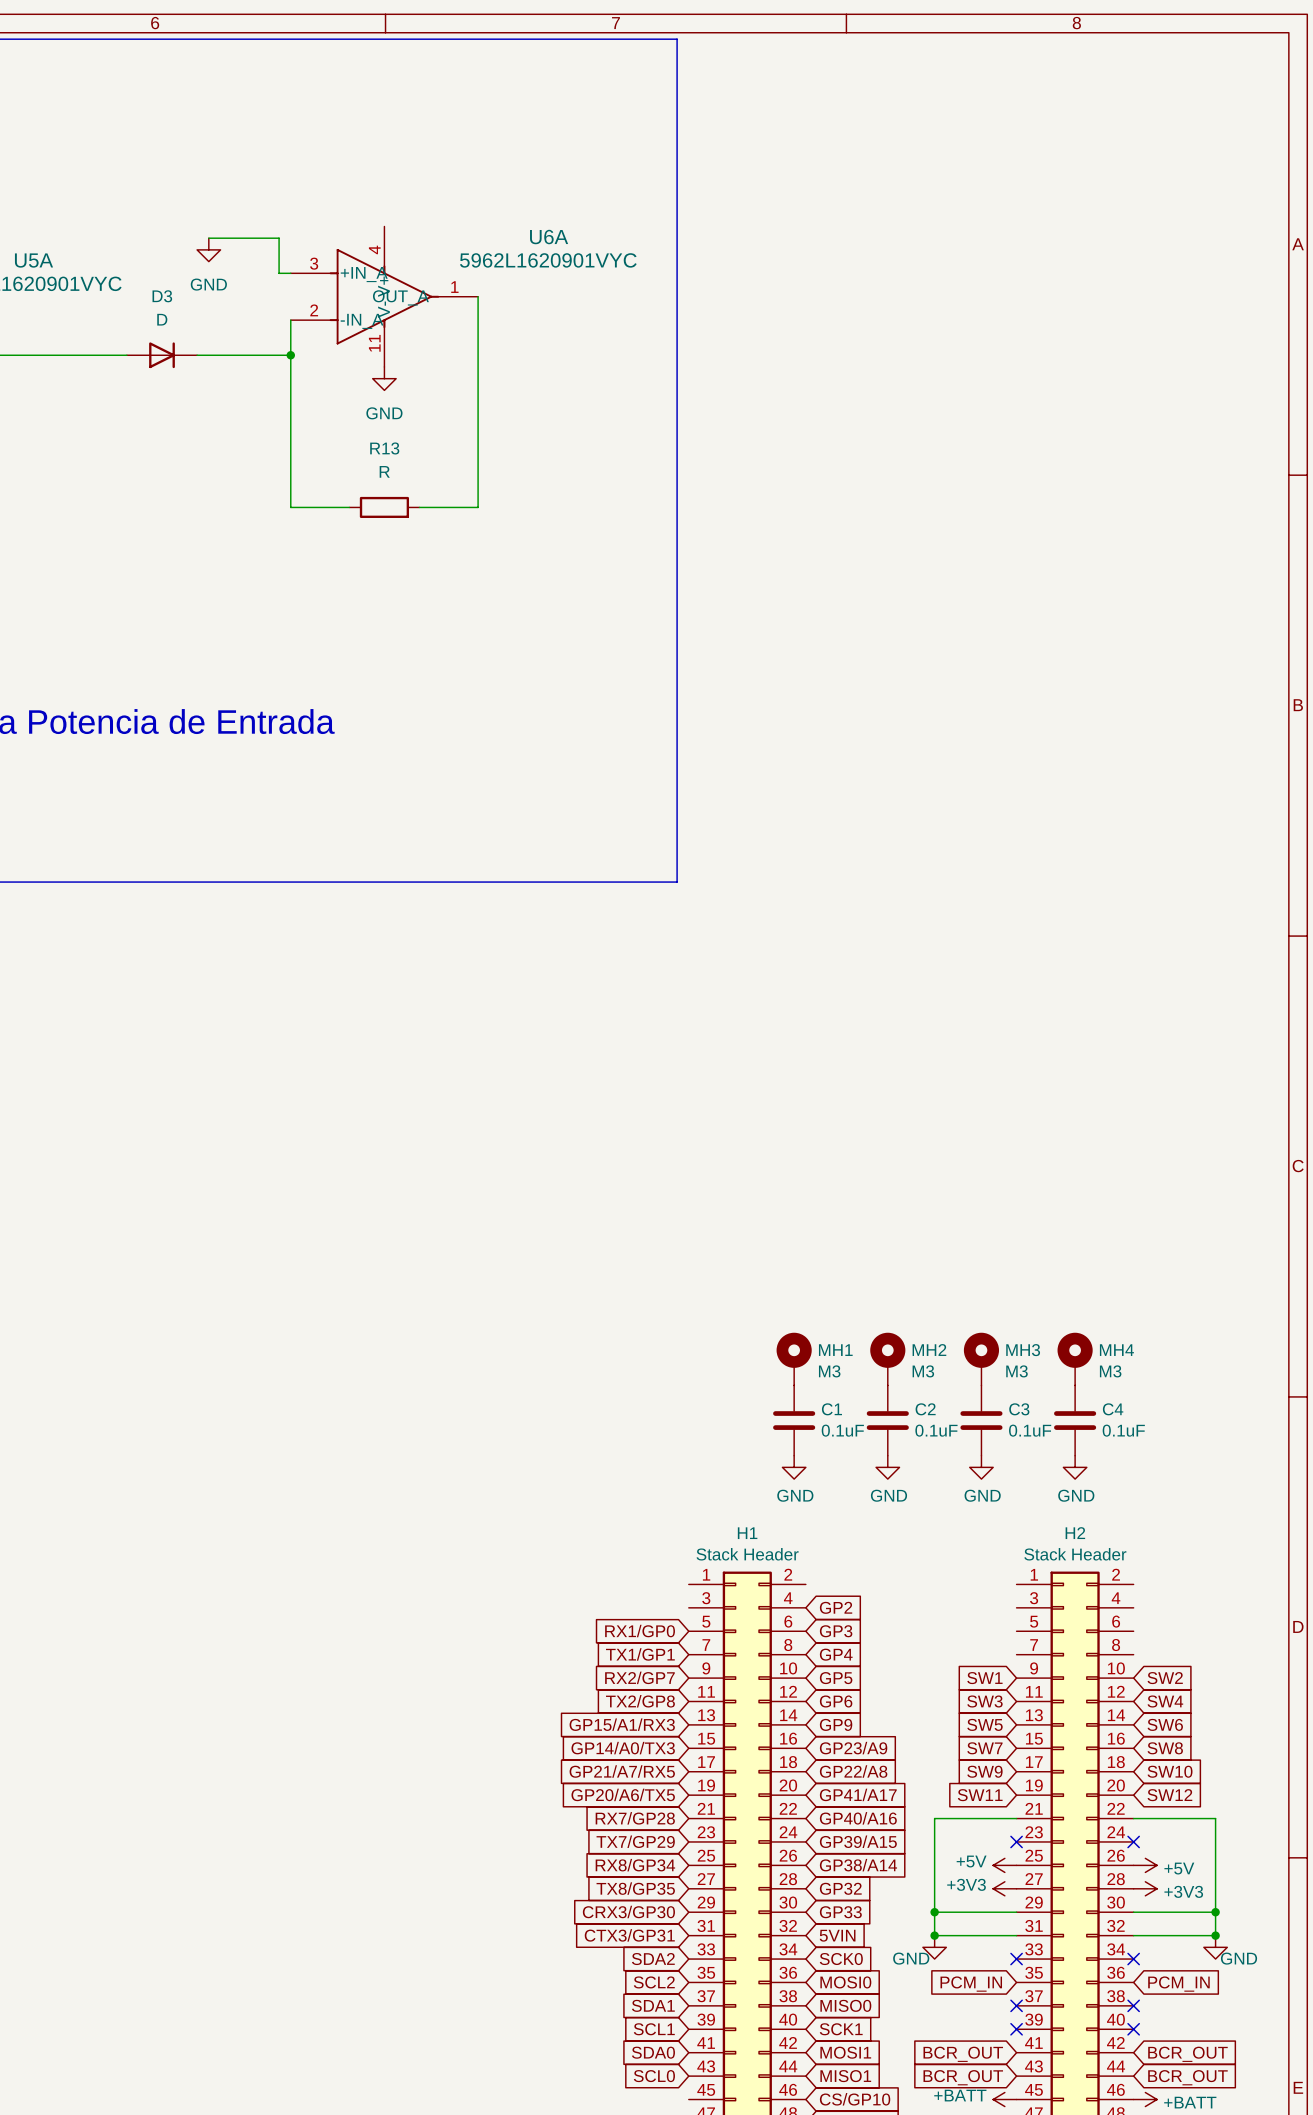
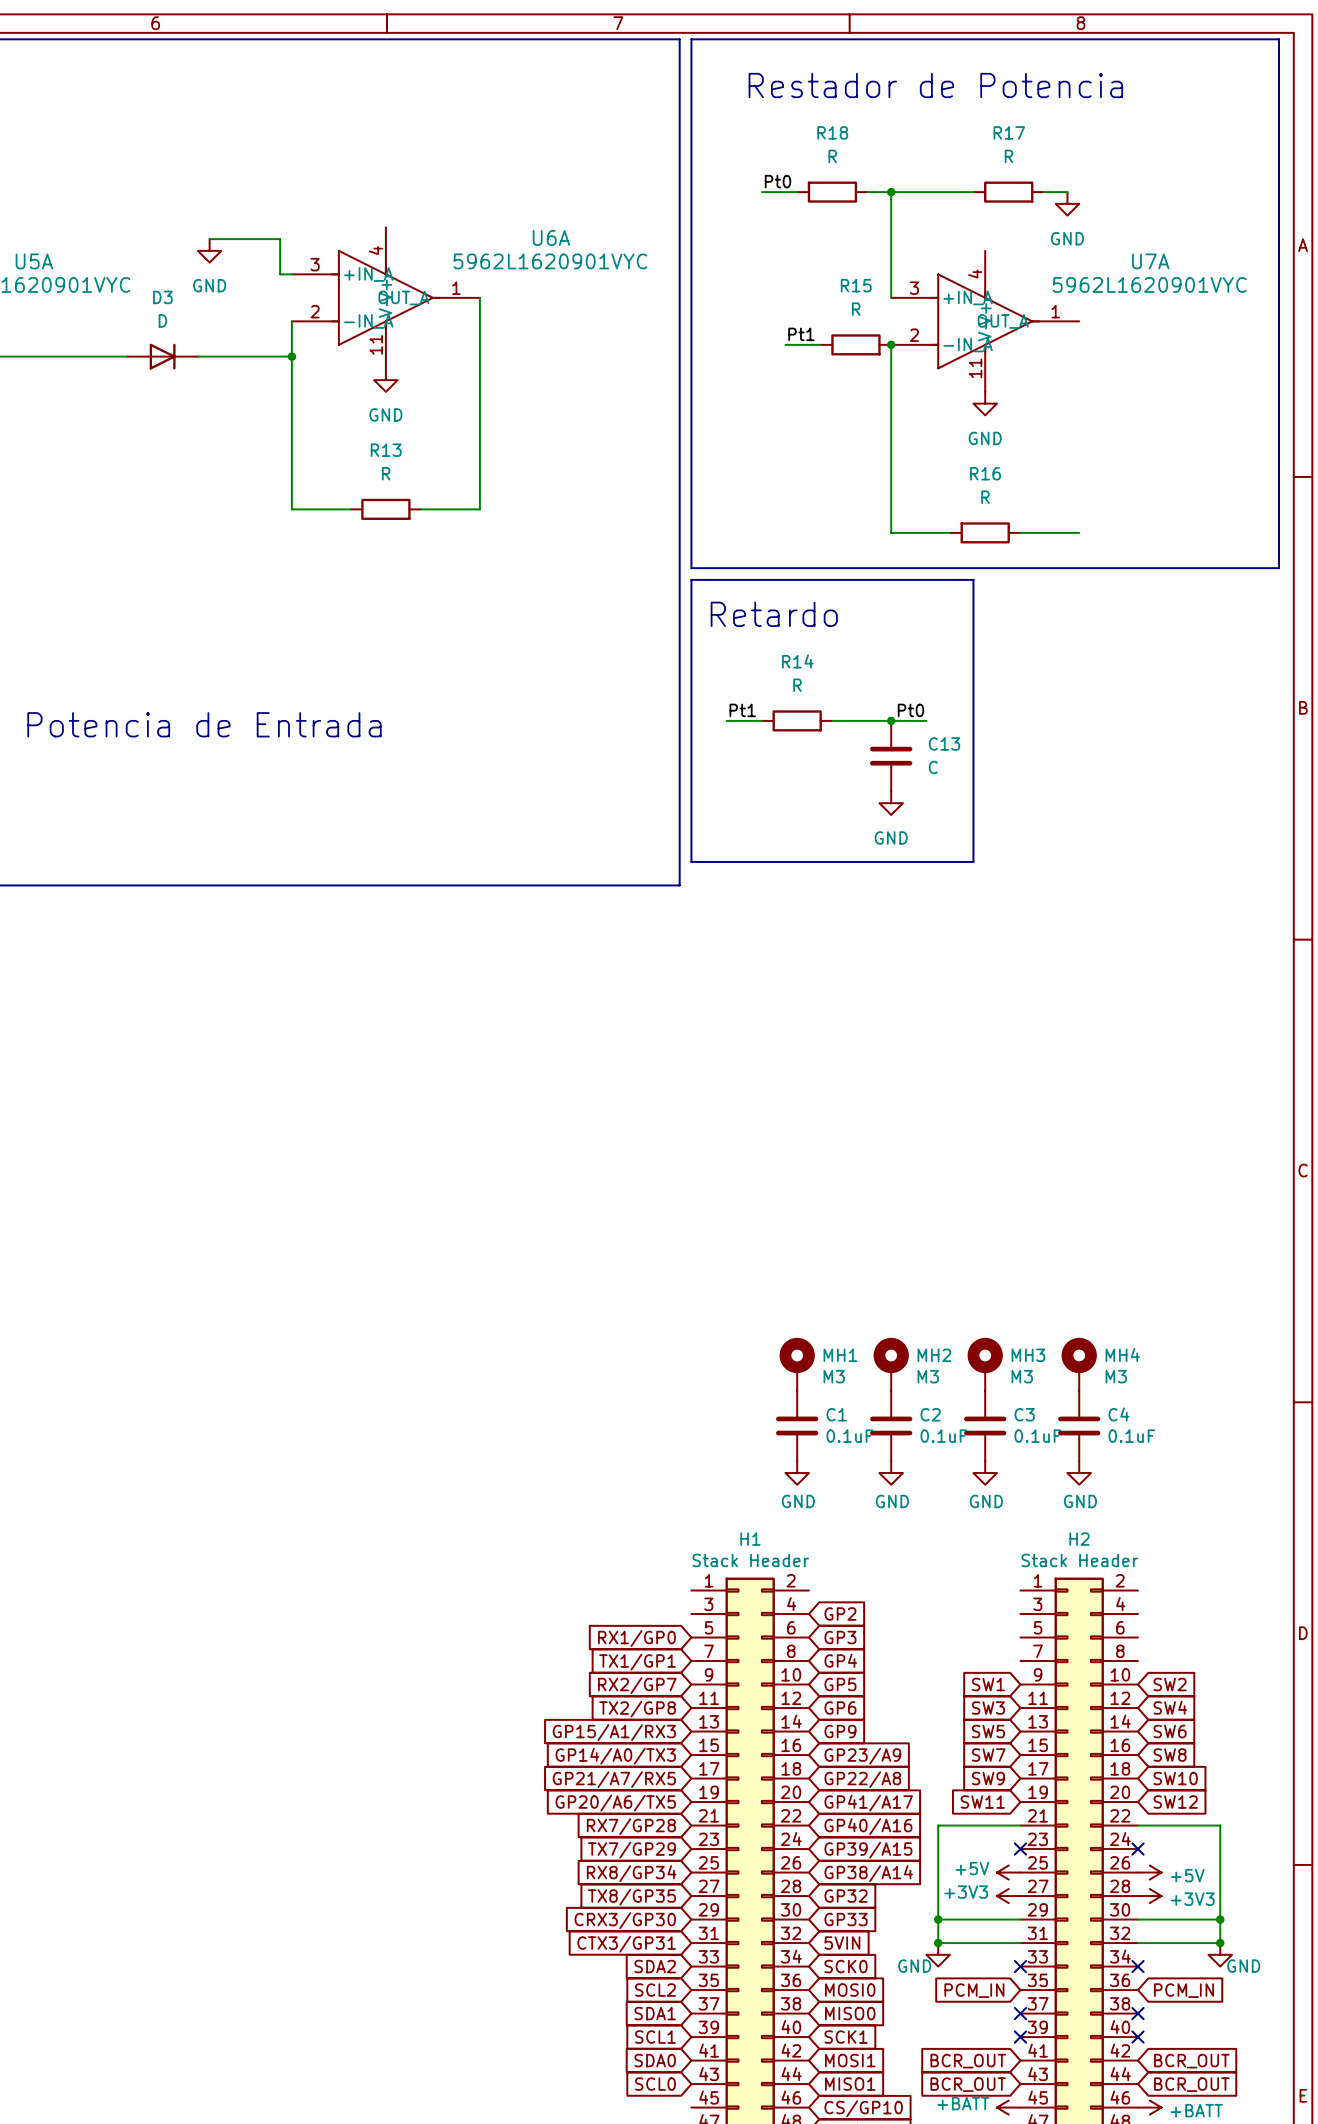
line: none -> (691, 39) (691, 568) (1279, 568) (1279, 39) (691, 39)
text: none -> Restador de Potencia (935, 85)
label: none -> Pt0 (777, 181)
wire: none -> (761, 192) (797, 192)
R18: none -> R (832, 192)
wire: none -> (867, 192) (973, 192)
wire: none -> (891, 192) (891, 297)
junction: none -> (891, 192)
R17: none -> R (1008, 192)
wire: none -> (1043, 192) (1067, 192)
power symbol: none -> GND (1067, 203)
U7A: none -> 5962L1620901VYC (985, 321)
label: none -> Pt1 (801, 334)
wire: none -> (785, 344) (820, 344)
R15: none -> R (855, 344)
wire: none -> (891, 344) (891, 532) (949, 532)
junction: none -> (891, 344)
power symbol: none -> GND (985, 403)
R16: none -> R (985, 532)
wire: none -> (1020, 532) (1079, 532)
line: none -> (691, 579) (973, 579) (973, 861) (691, 861) (691, 579)
text: none -> Retardo (774, 614)
label: none -> Pt1 (742, 710)
label: none -> Pt0 (910, 710)
wire: none -> (726, 720) (761, 720)
R14: none -> R (797, 720)
wire: none -> (832, 720) (926, 720)
junction: none -> (891, 720)
C13: none -> C (891, 756)
power symbol: none -> GND (891, 803)

